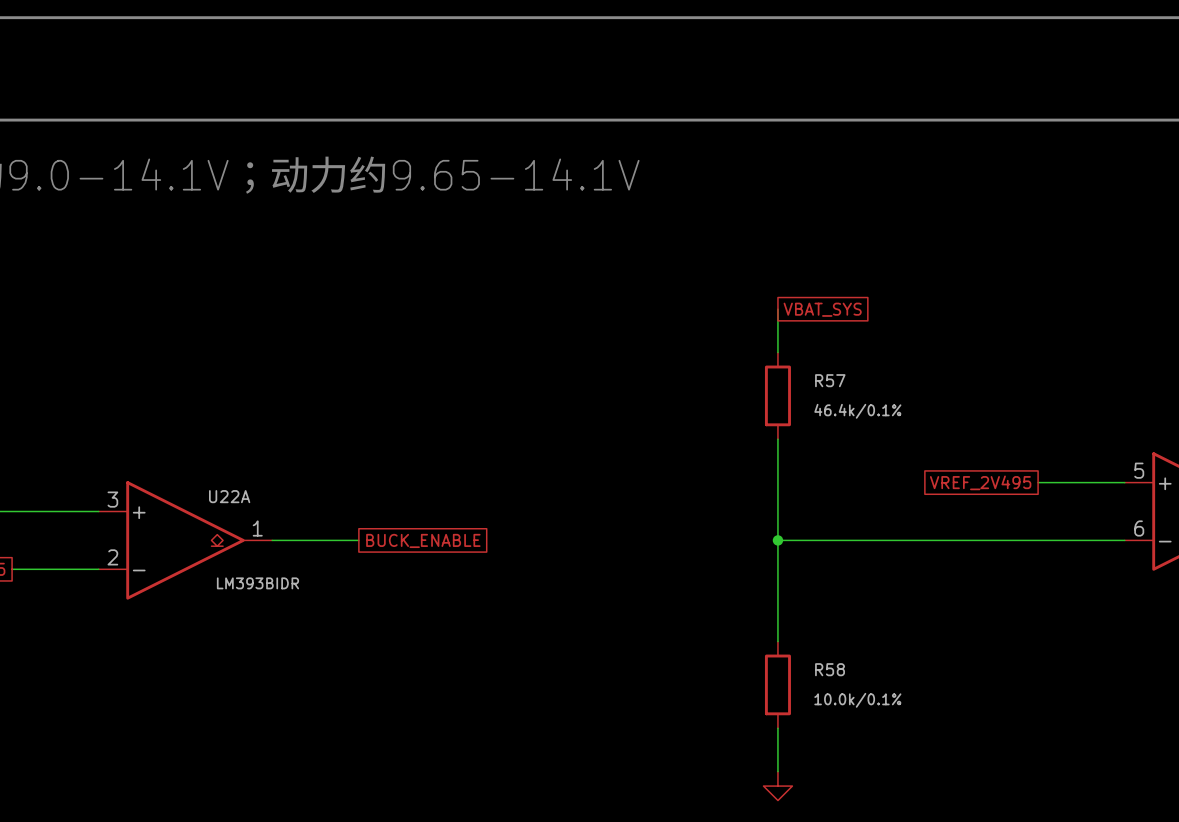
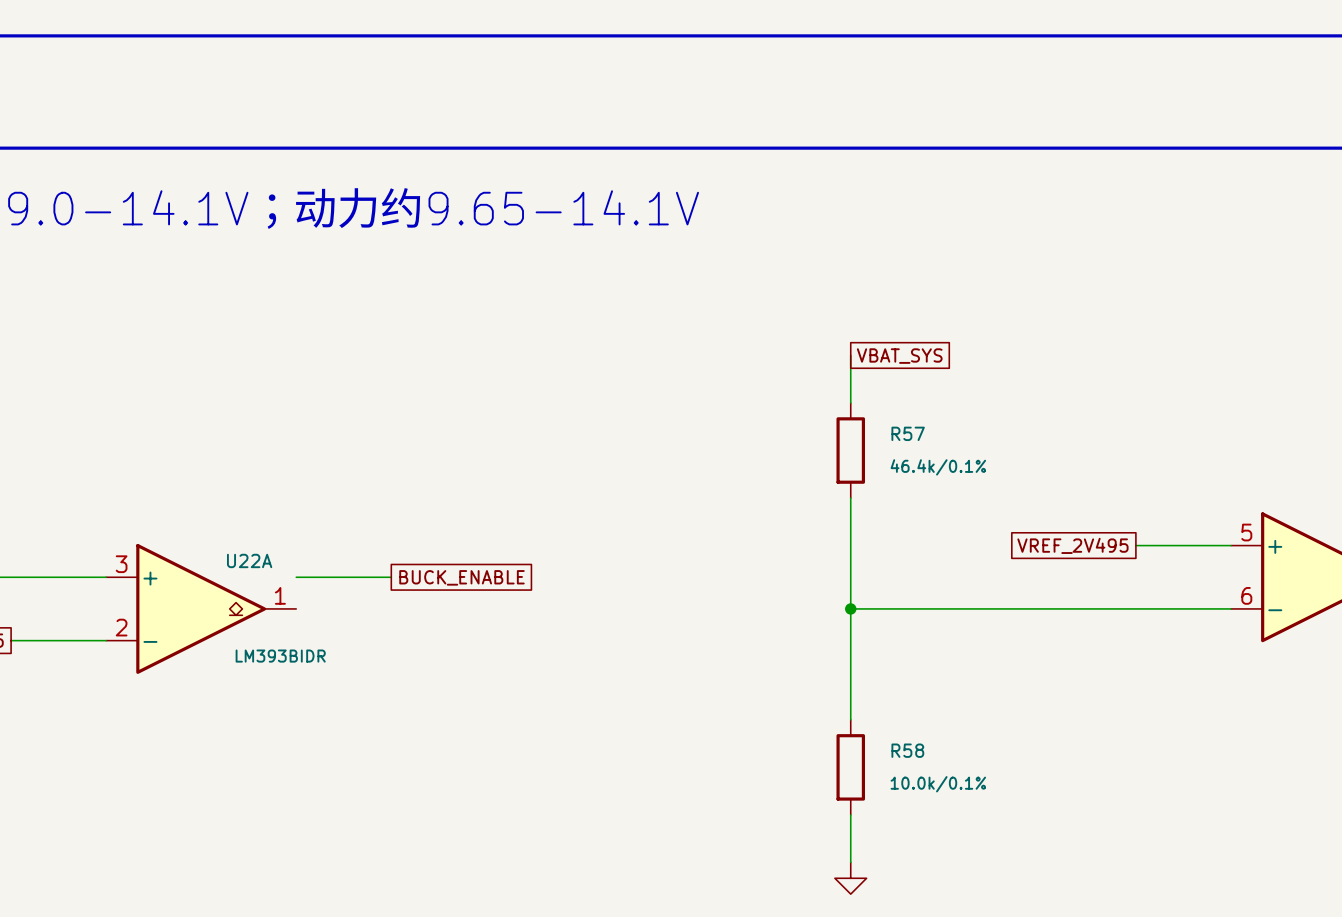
wire: (272, 540) (358, 540) -> (296, 577) (391, 577)
global label position: BUCK_ENABLE (423, 540) -> BUCK_ENABLE (461, 577)

